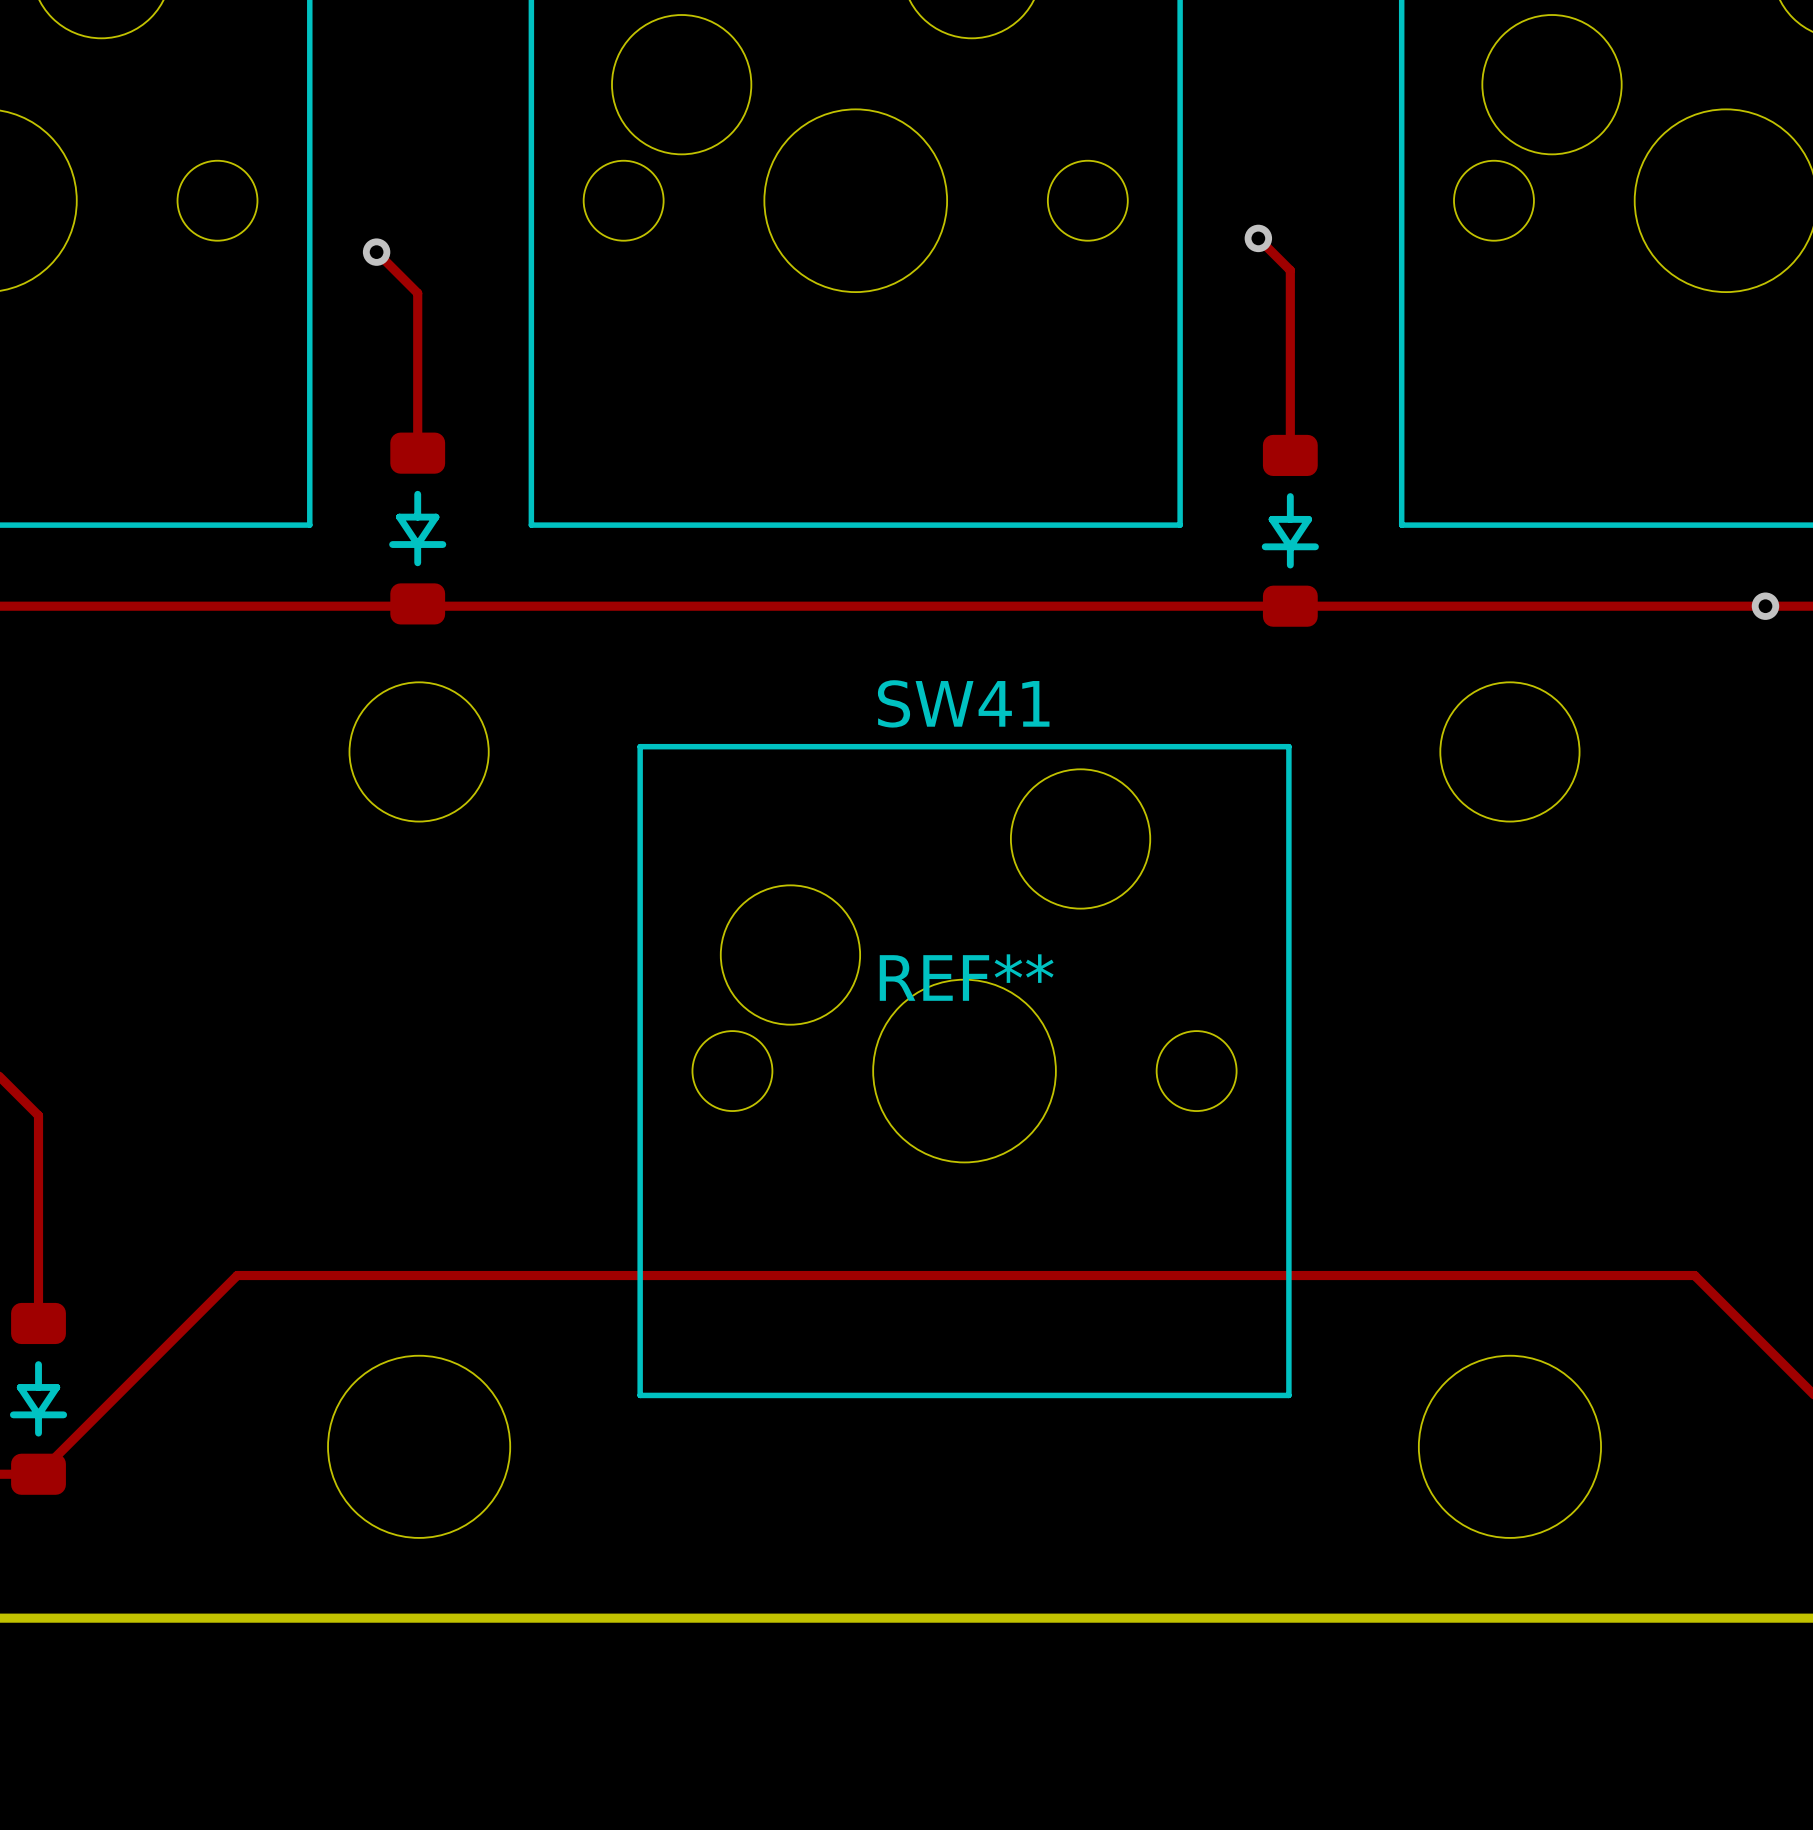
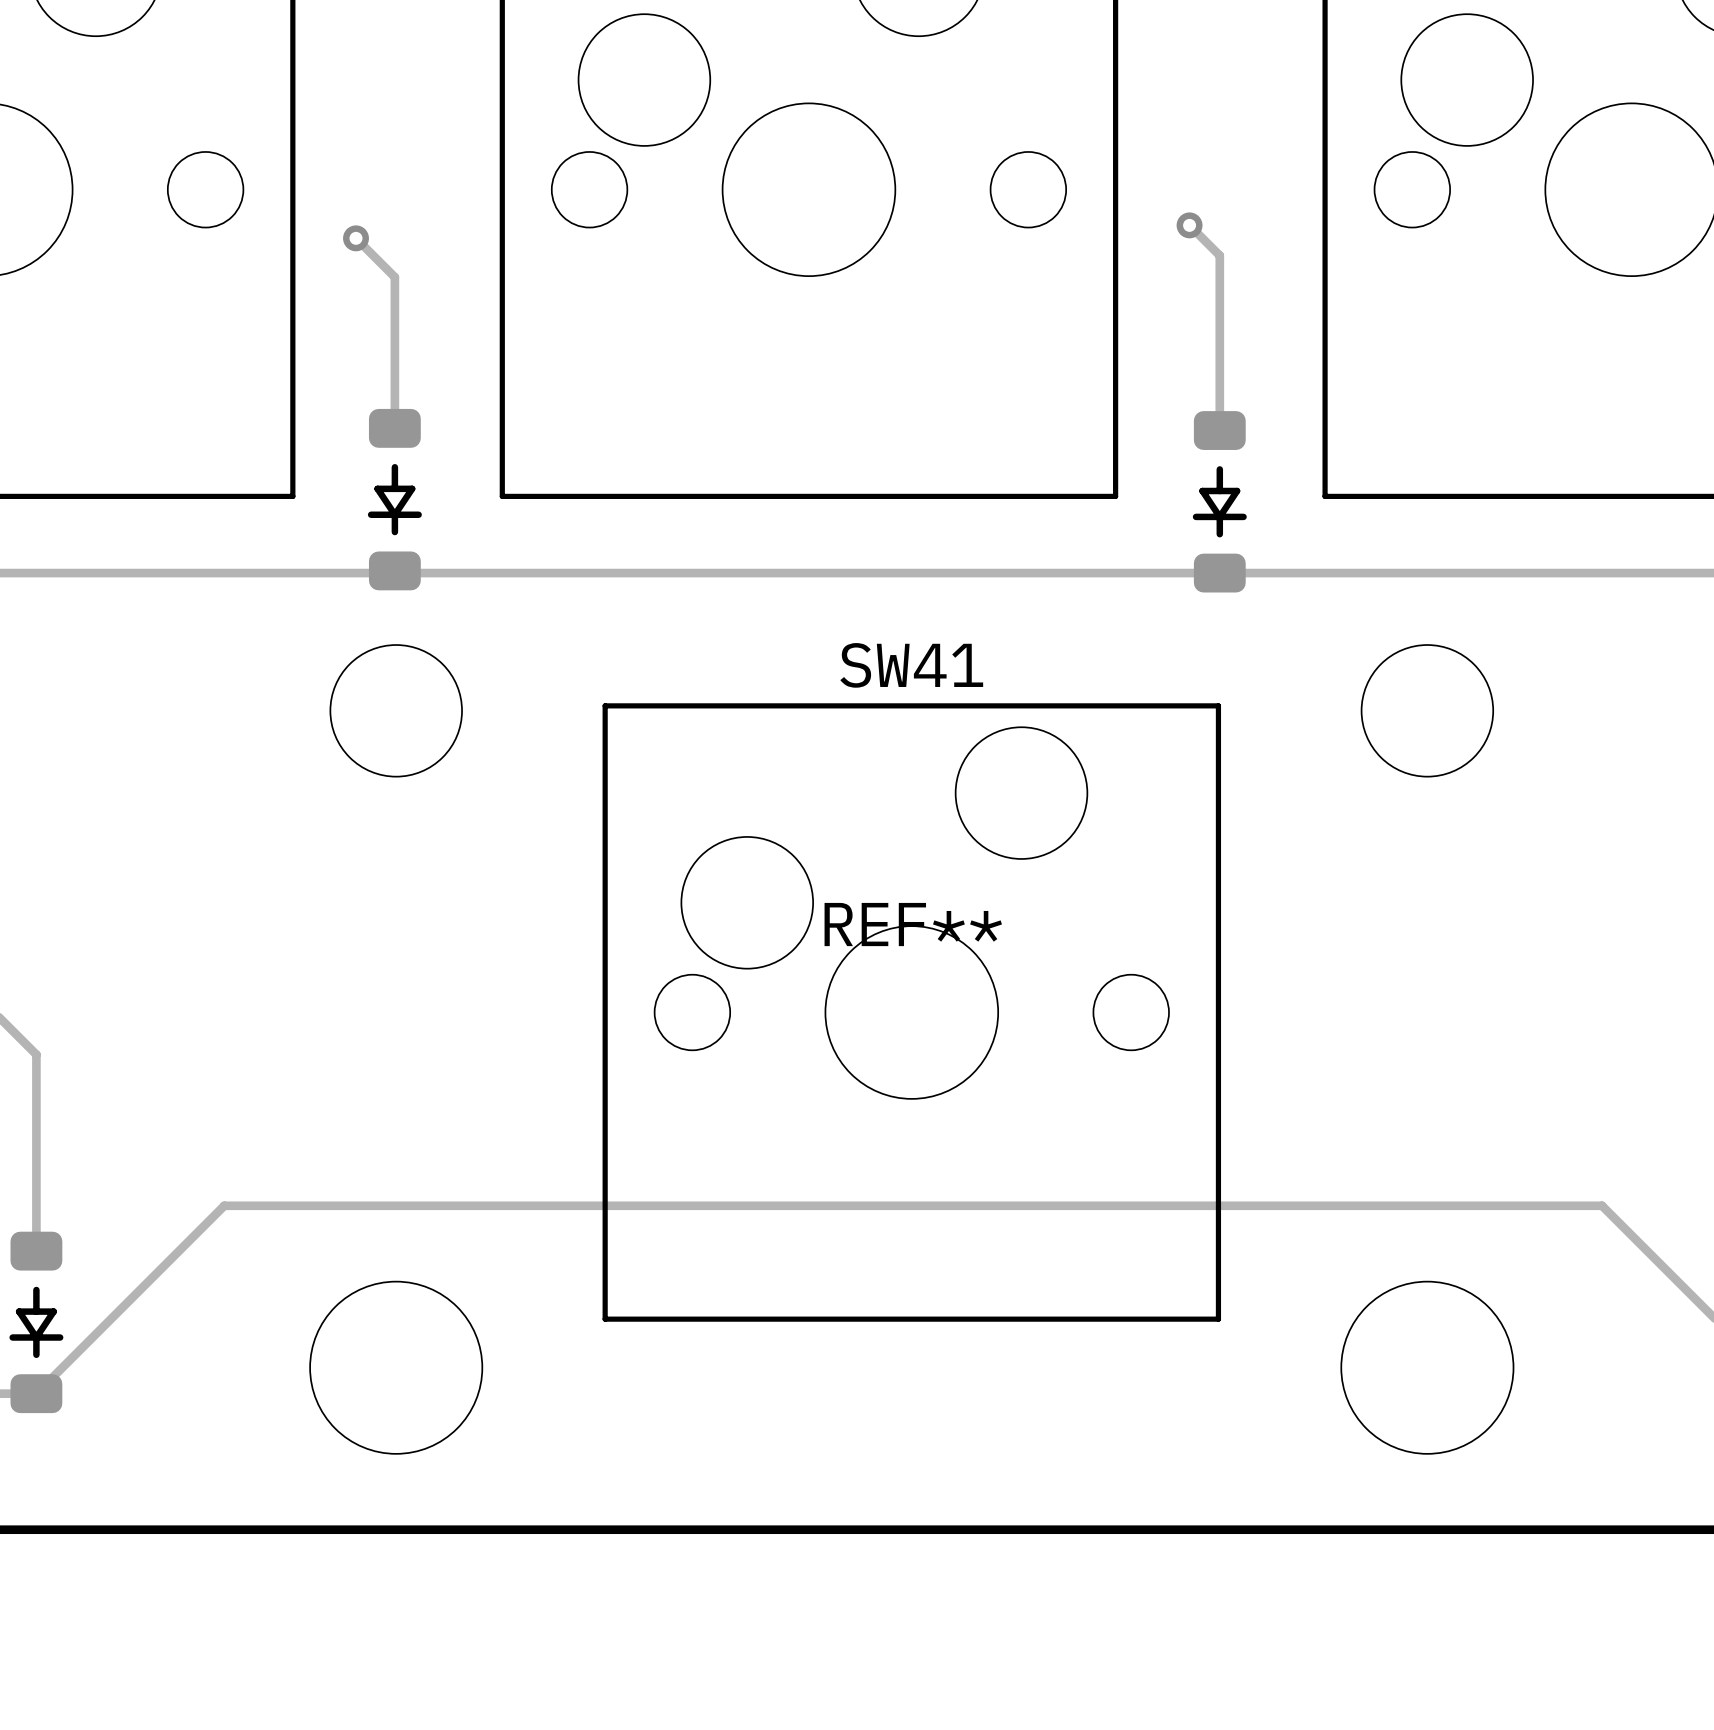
via: (1765, 606) -> none

